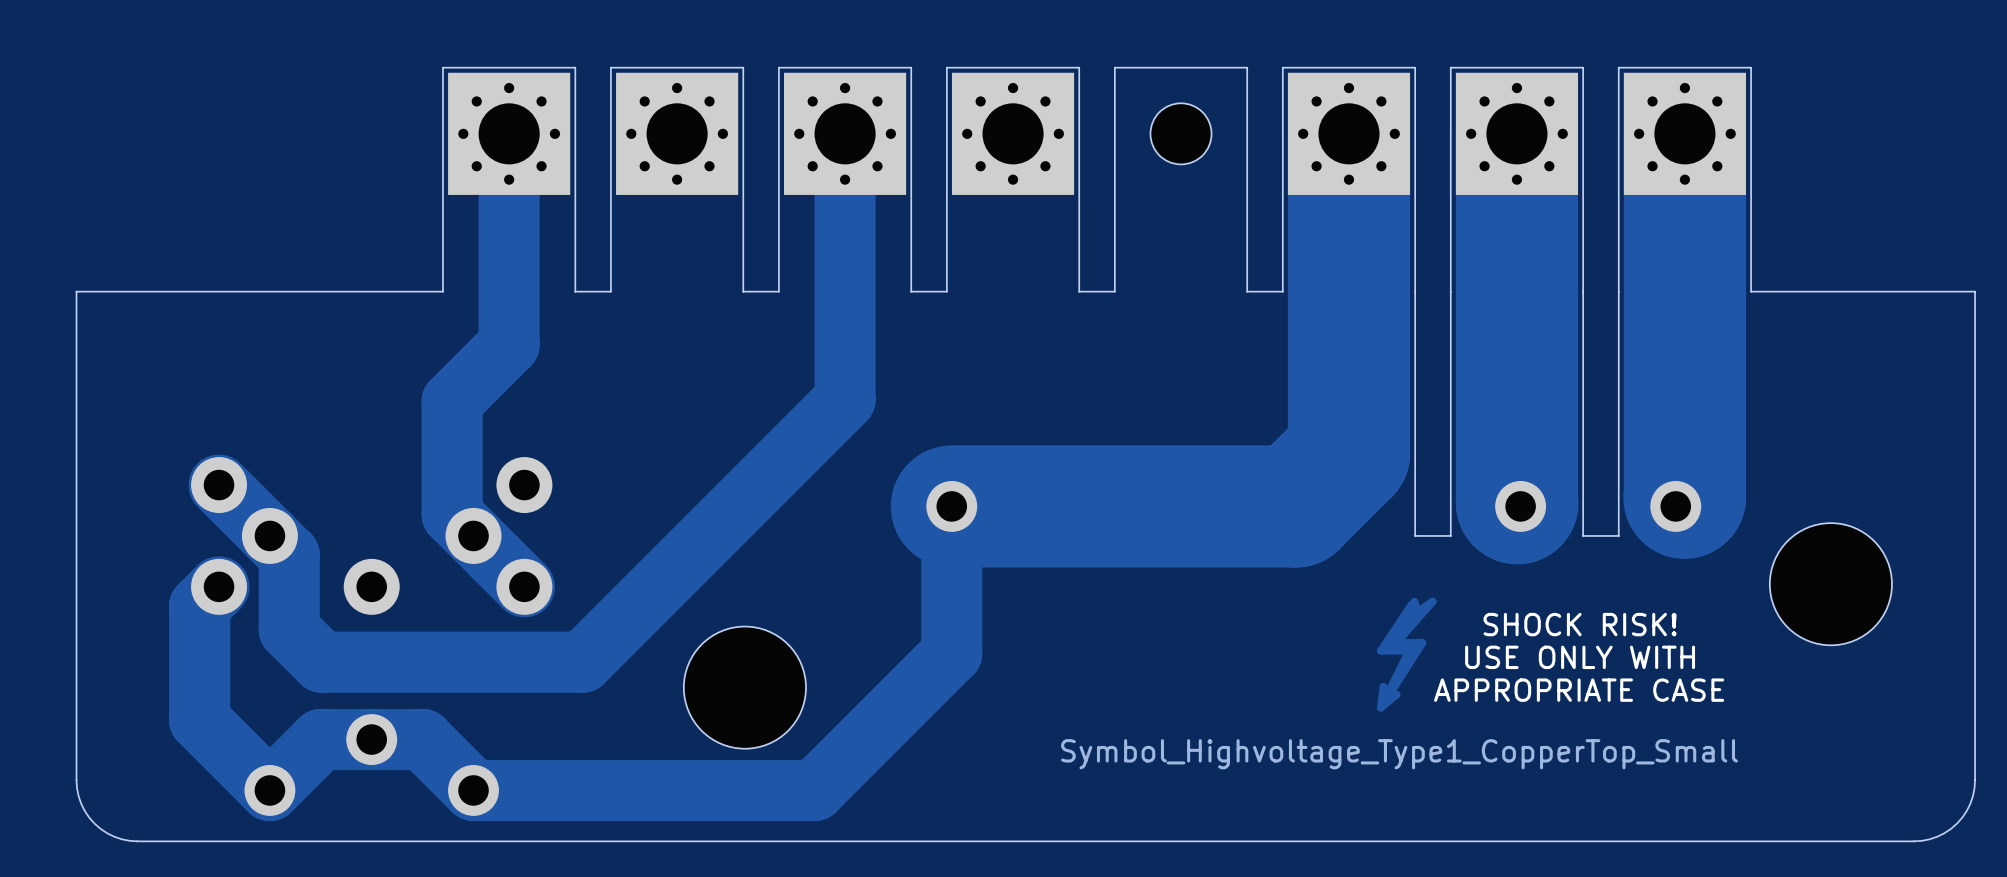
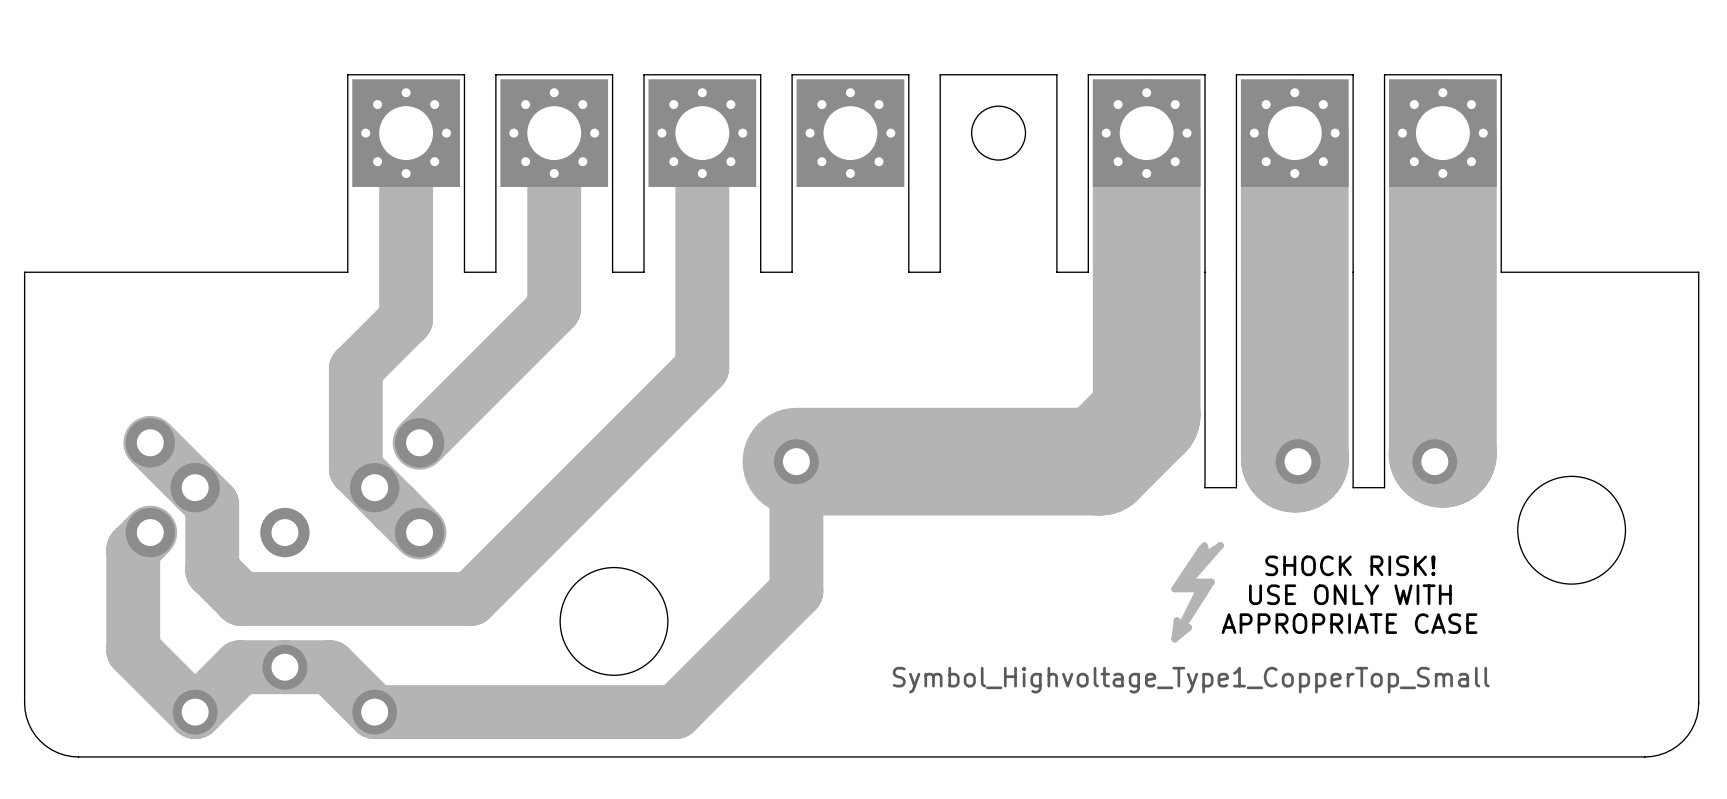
track: none -> (554, 133) (554, 308) (419, 442)

